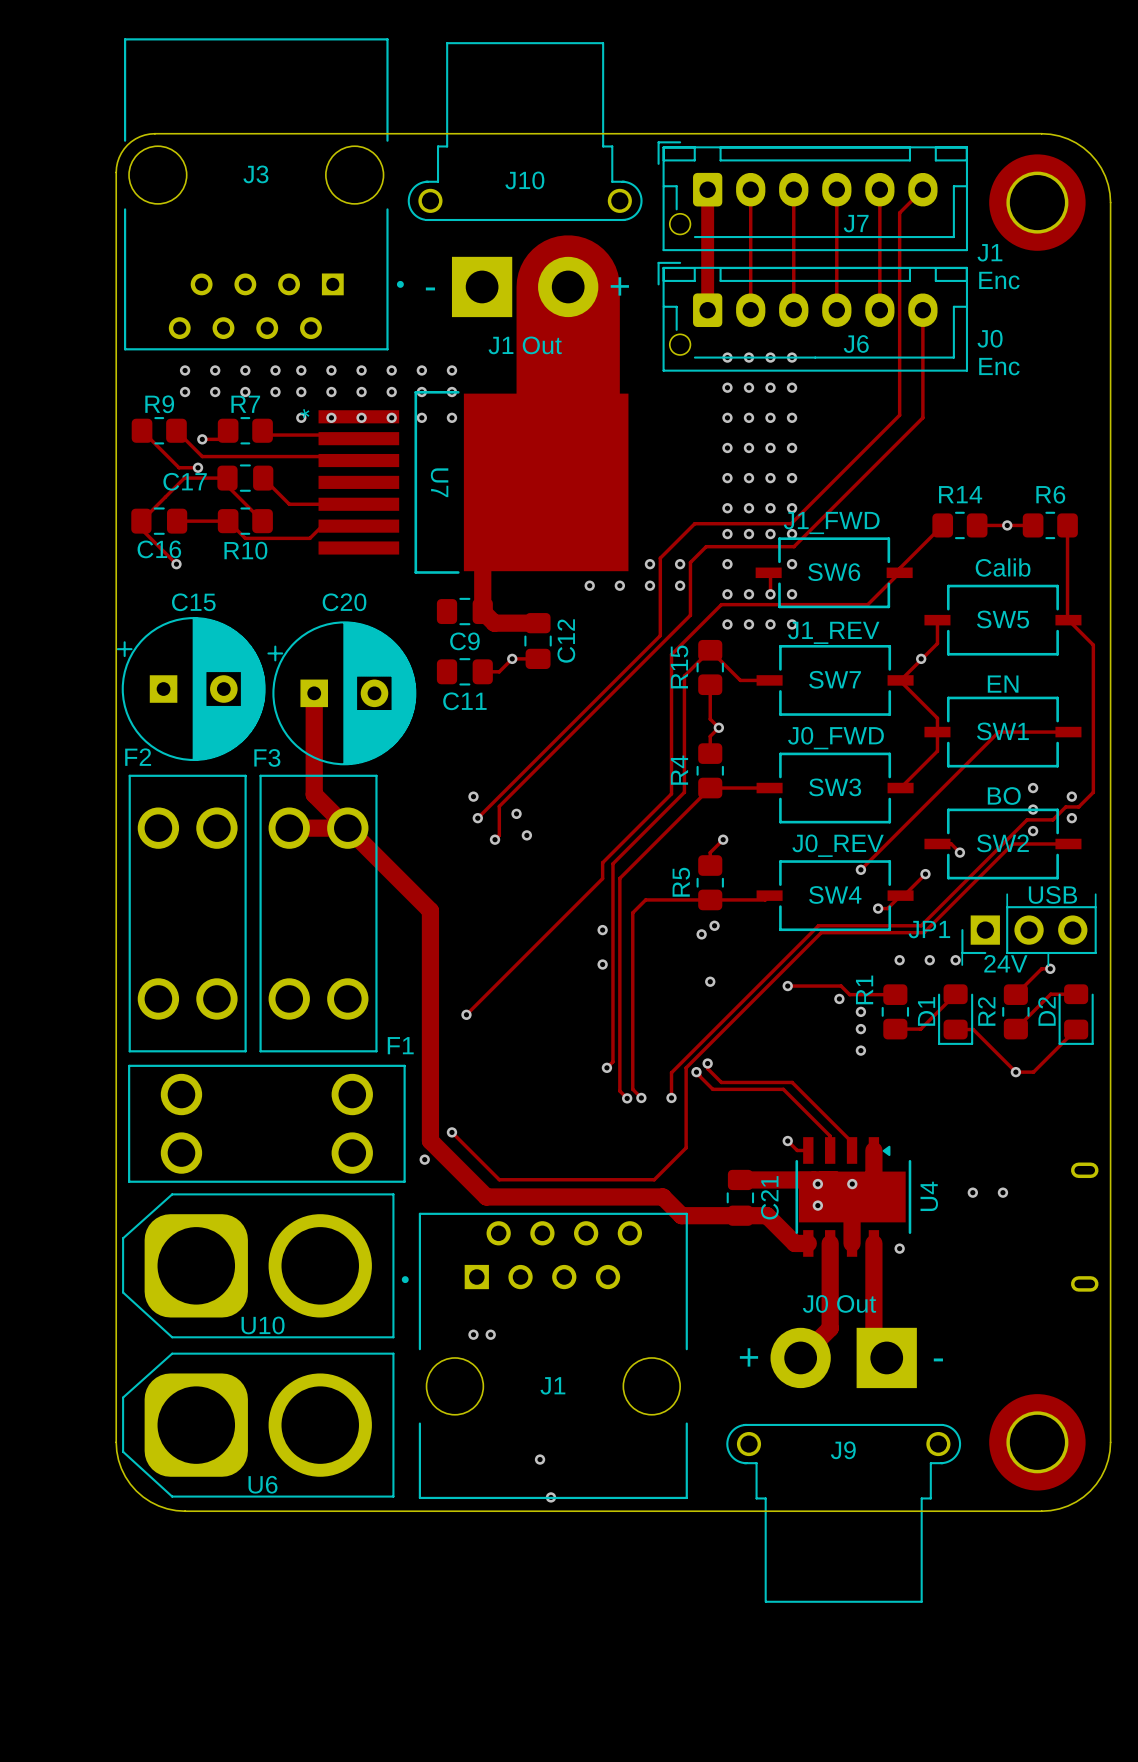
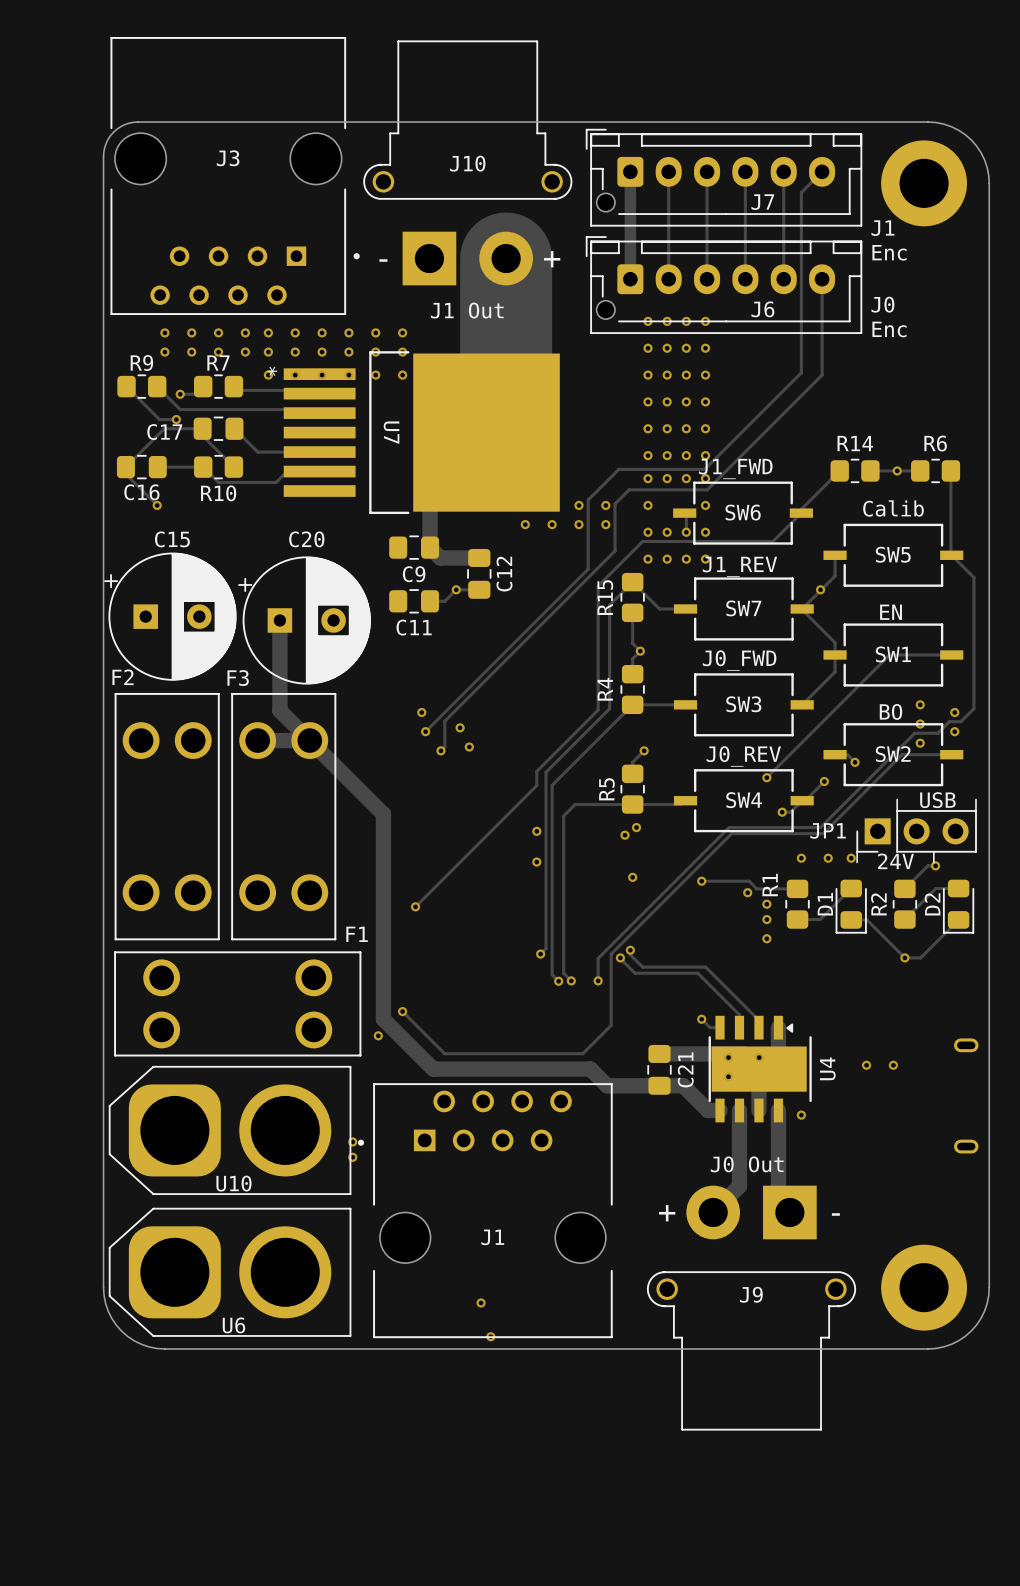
via: none -> (352, 1141)
via: none -> (352, 1157)
via: (473, 1334) -> none
via: (490, 1334) -> none

